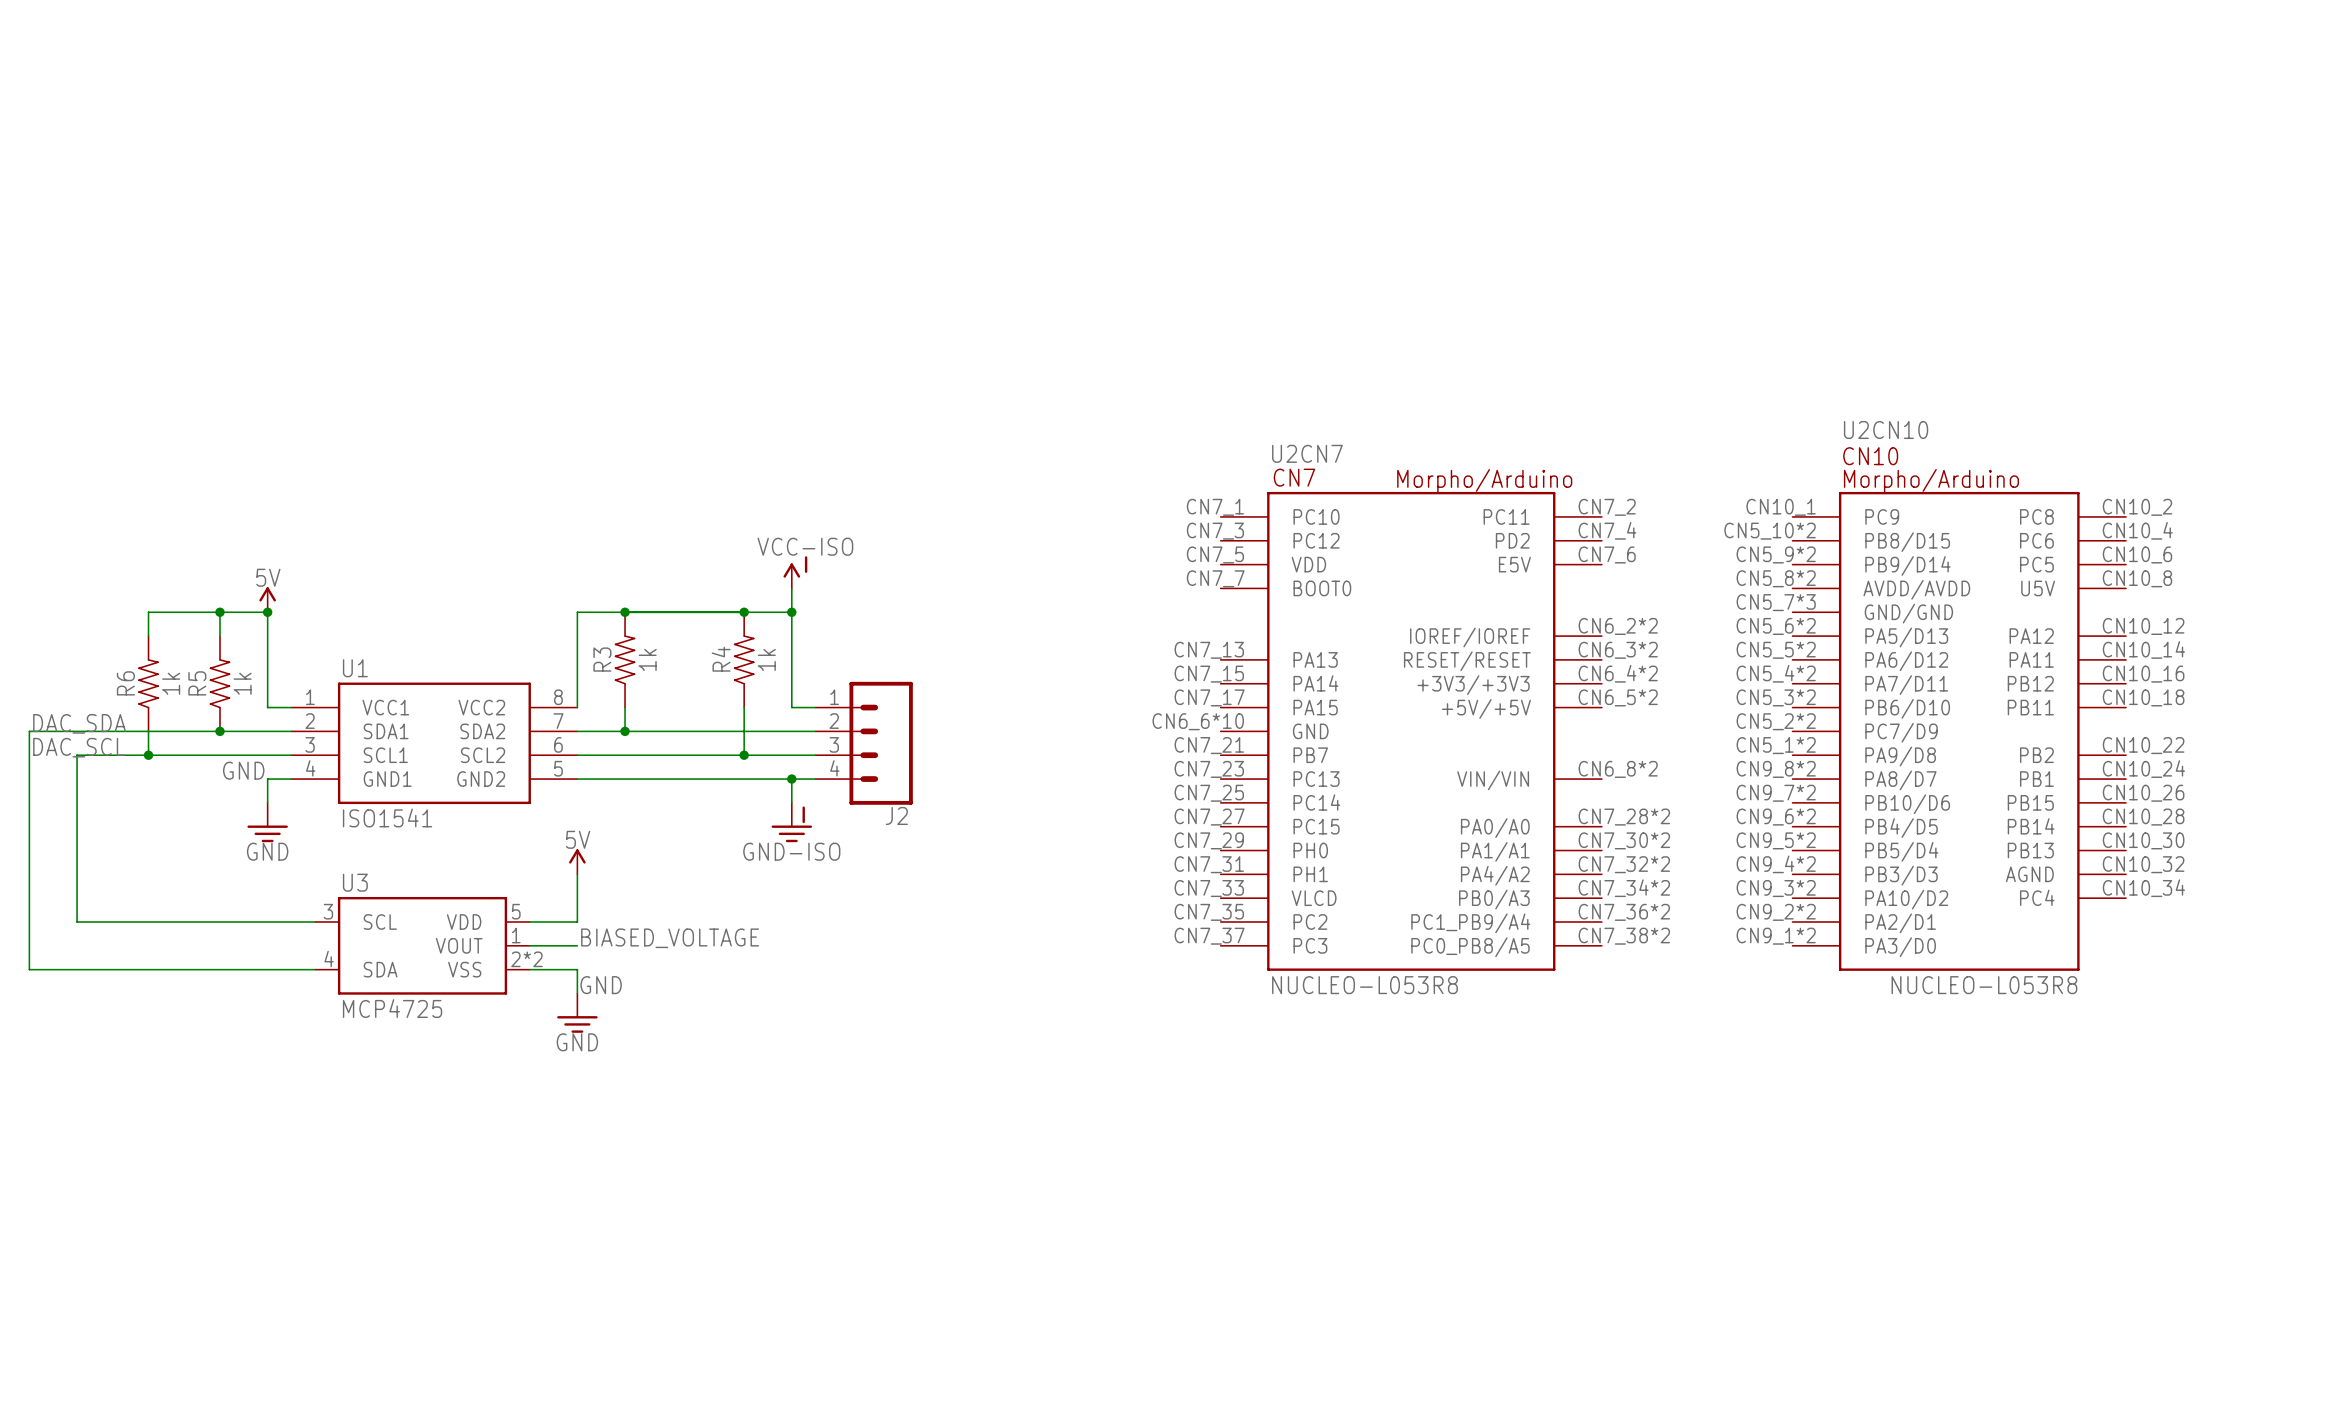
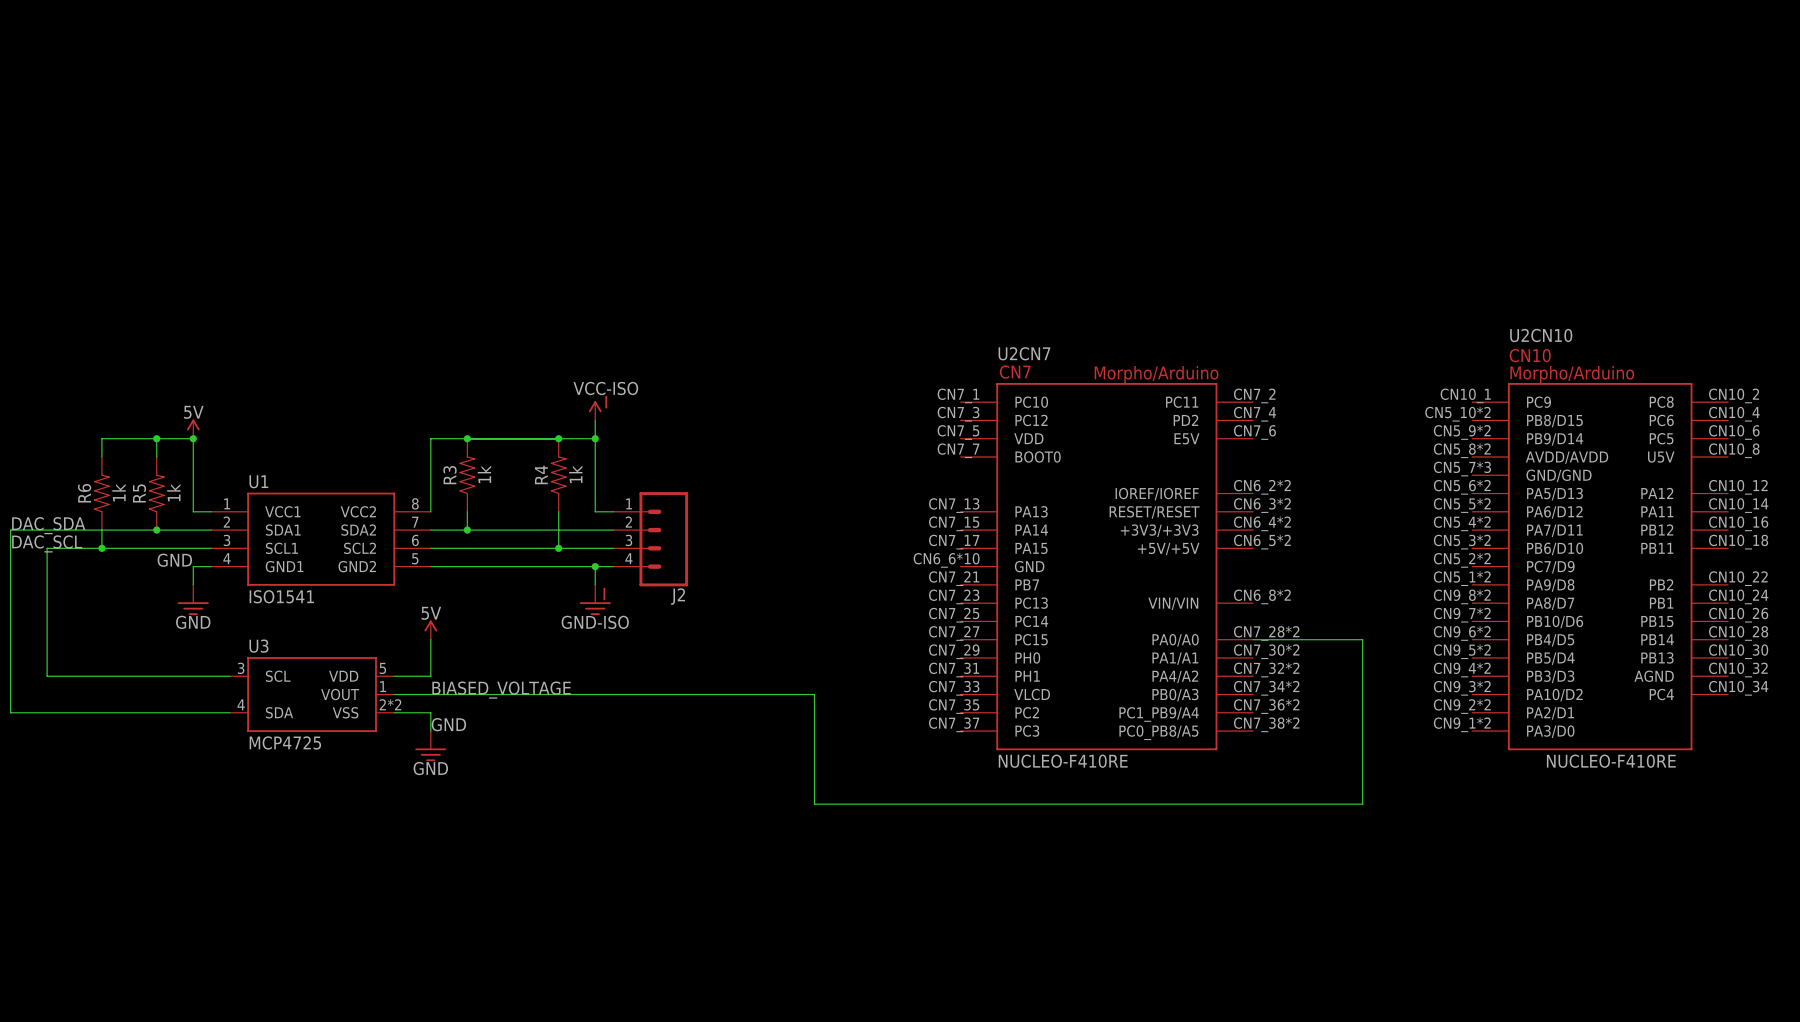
U2CN7 position: (1411, 731) -> (1106, 566)
U2CN10 position: (1959, 731) -> (1600, 566)
wire: none -> (1253, 639) (1362, 639) (1362, 804) (814, 804) (814, 694) (430, 694)
U2CN7 value: NUCLEO-L053R8 (1364, 985) -> NUCLEO-F410RE (1063, 761)
U2CN10 value: NUCLEO-L053R8 (1984, 985) -> NUCLEO-F410RE (1611, 761)

